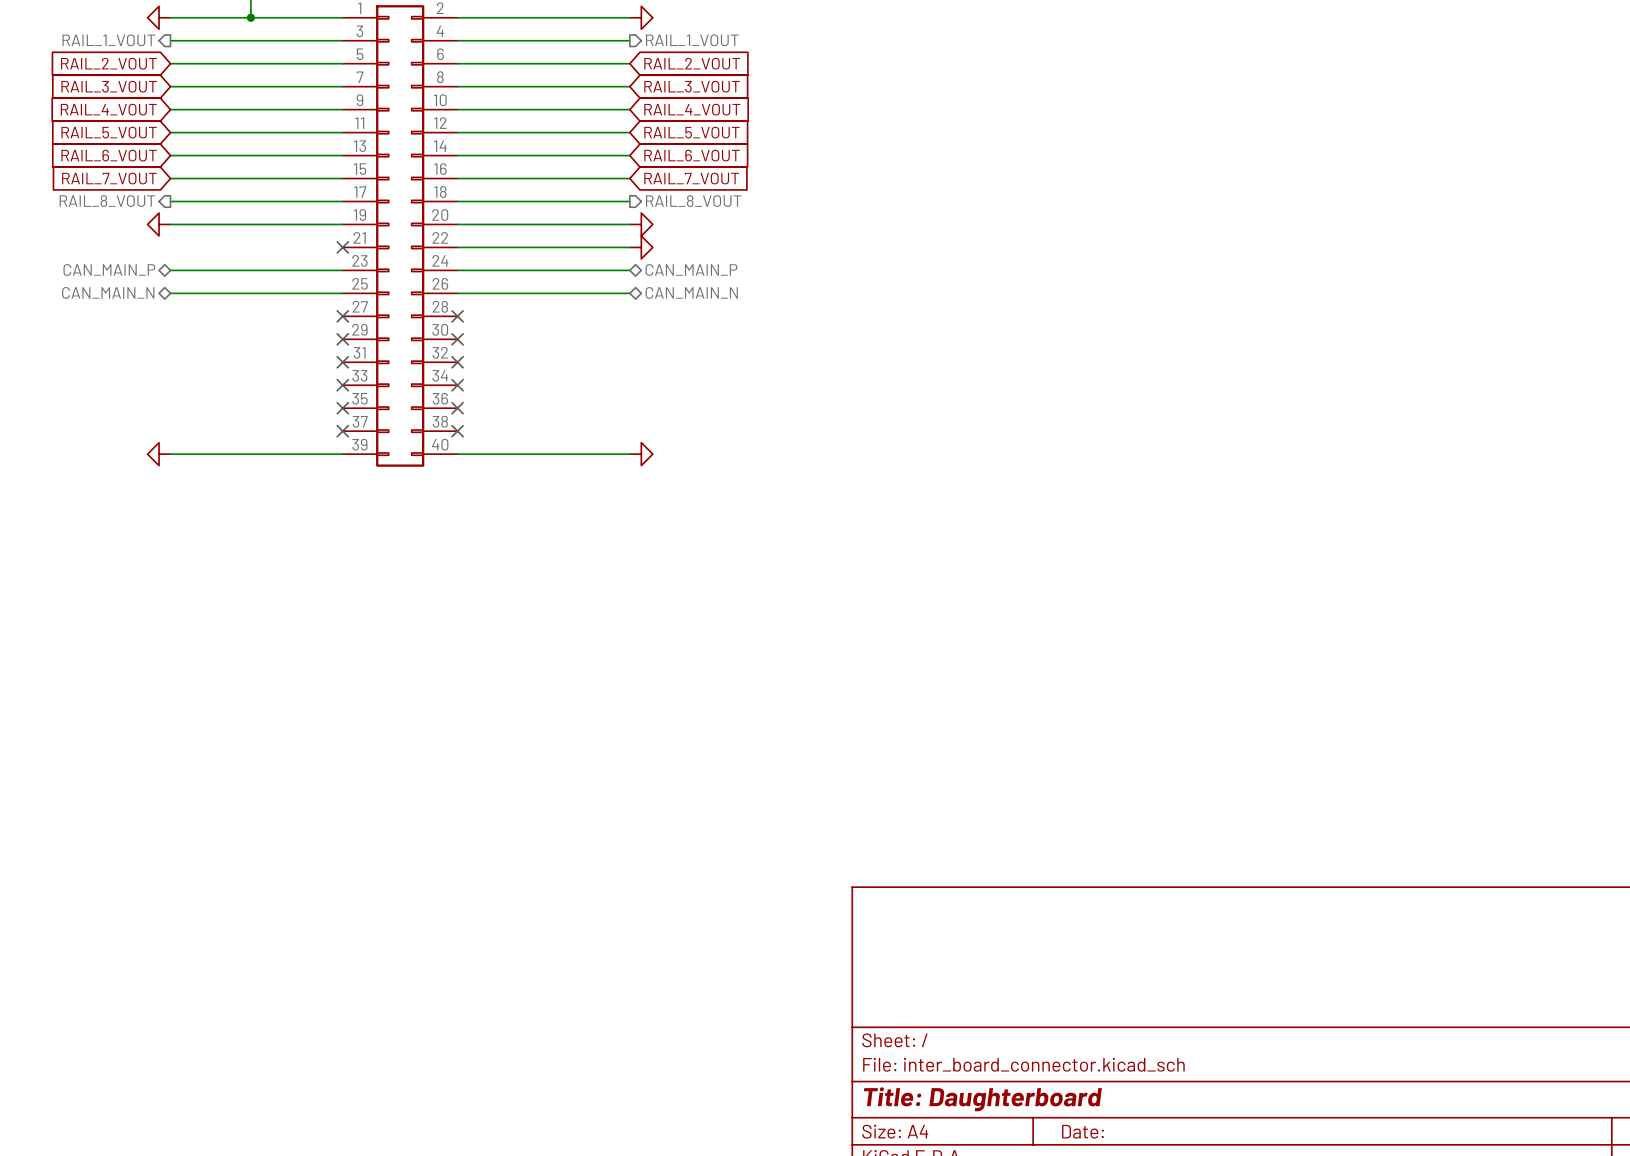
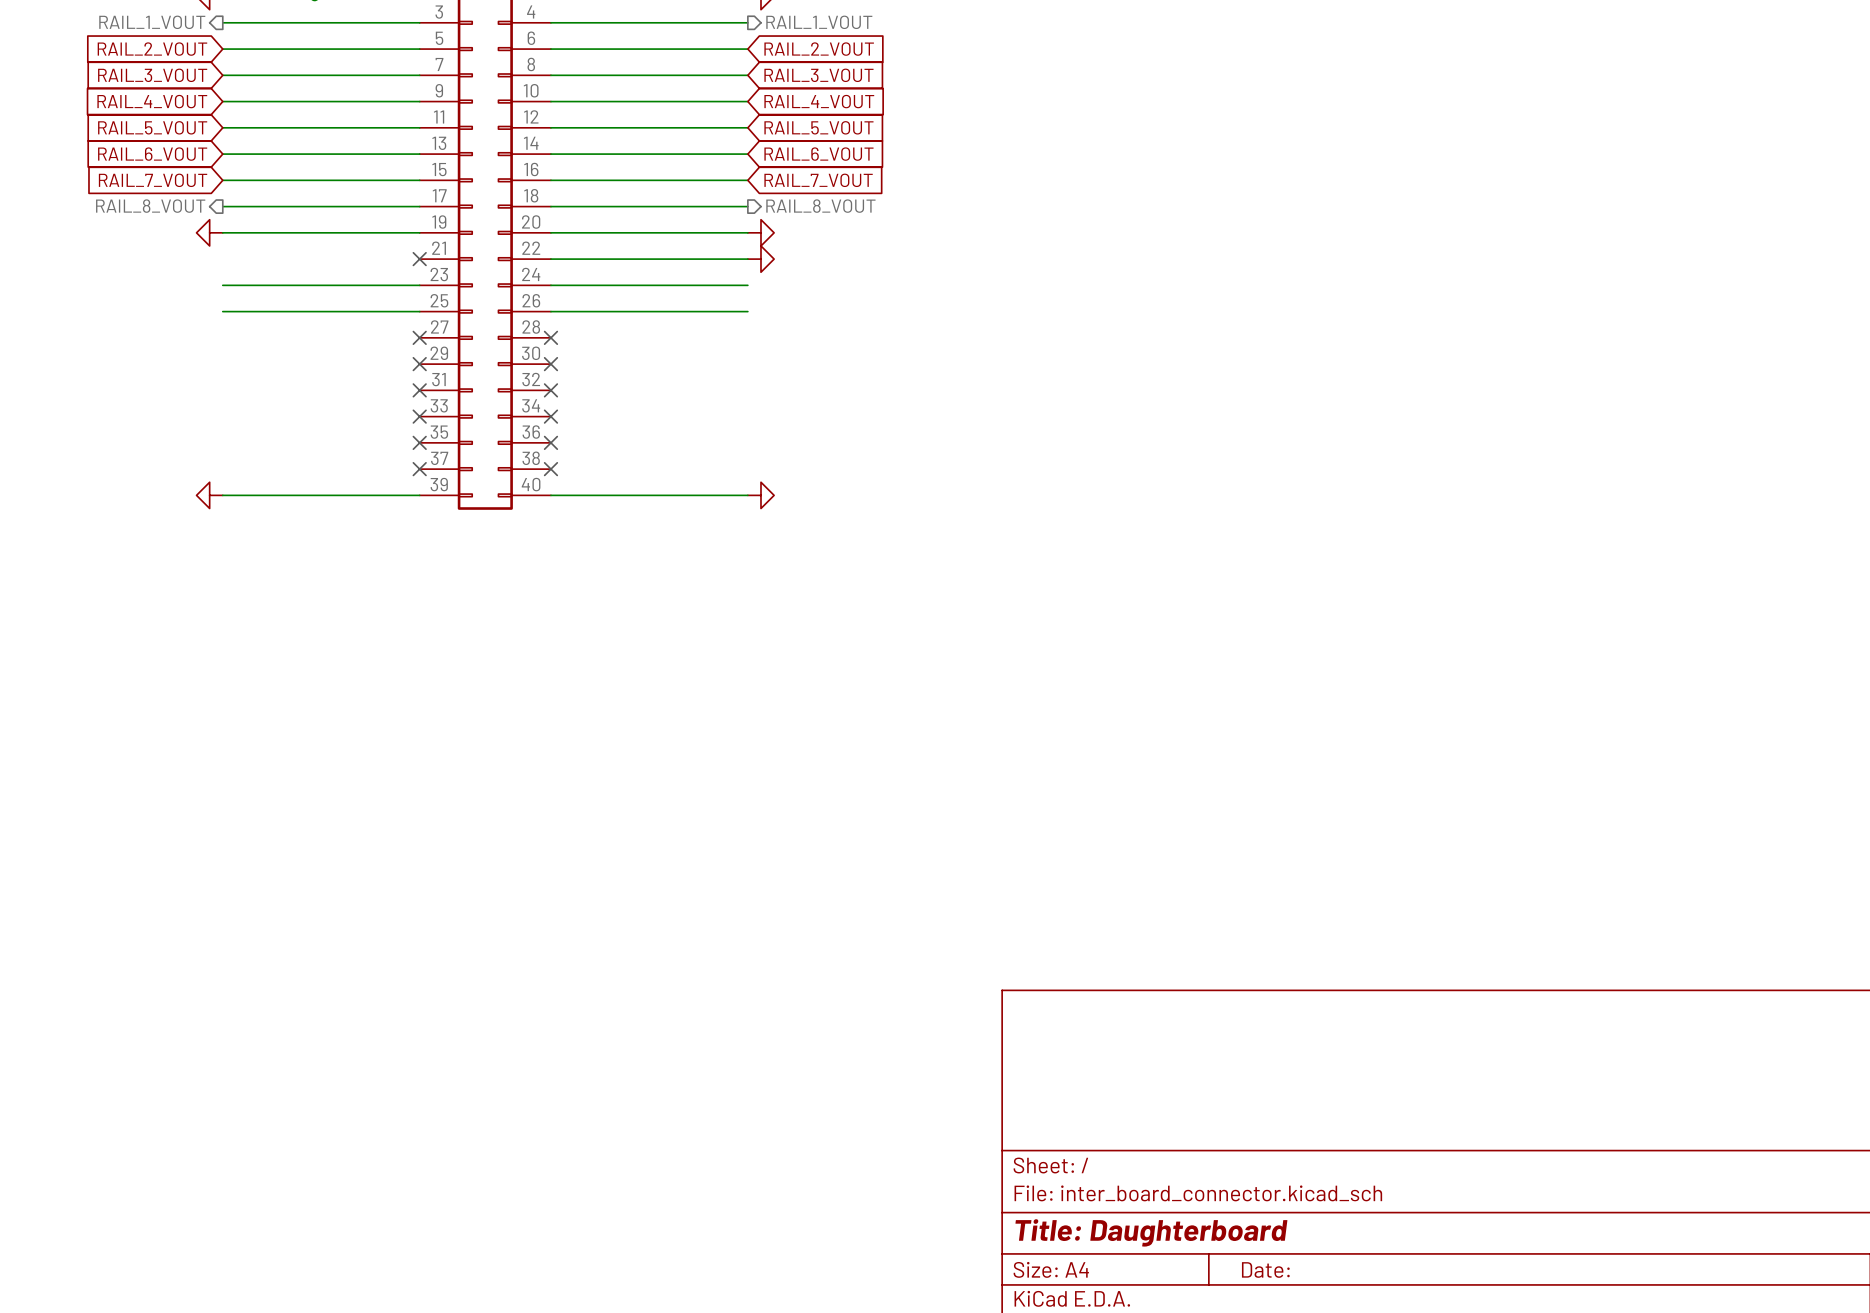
hierarchical label: CAN_MAIN_P (109, 269) -> none
hierarchical label: CAN_MAIN_P (691, 269) -> none
hierarchical label: CAN_MAIN_N (108, 292) -> none
hierarchical label: CAN_MAIN_N (691, 292) -> none

